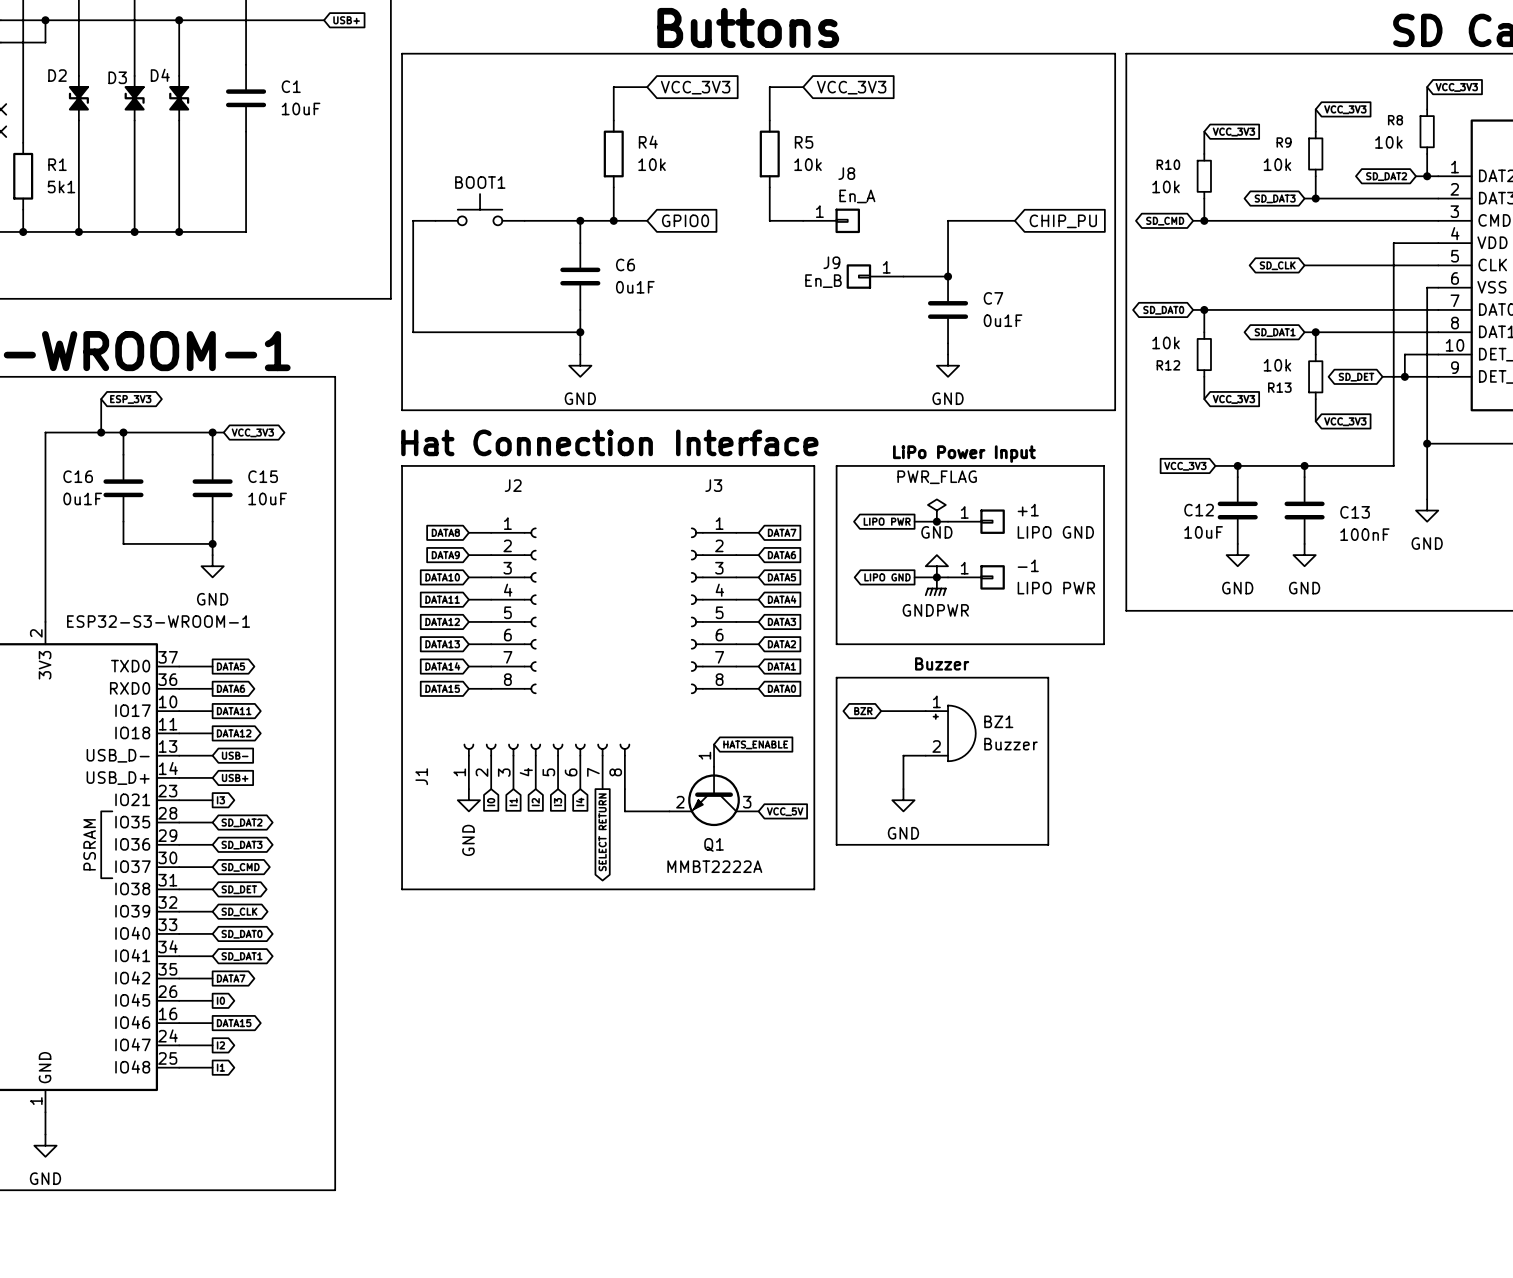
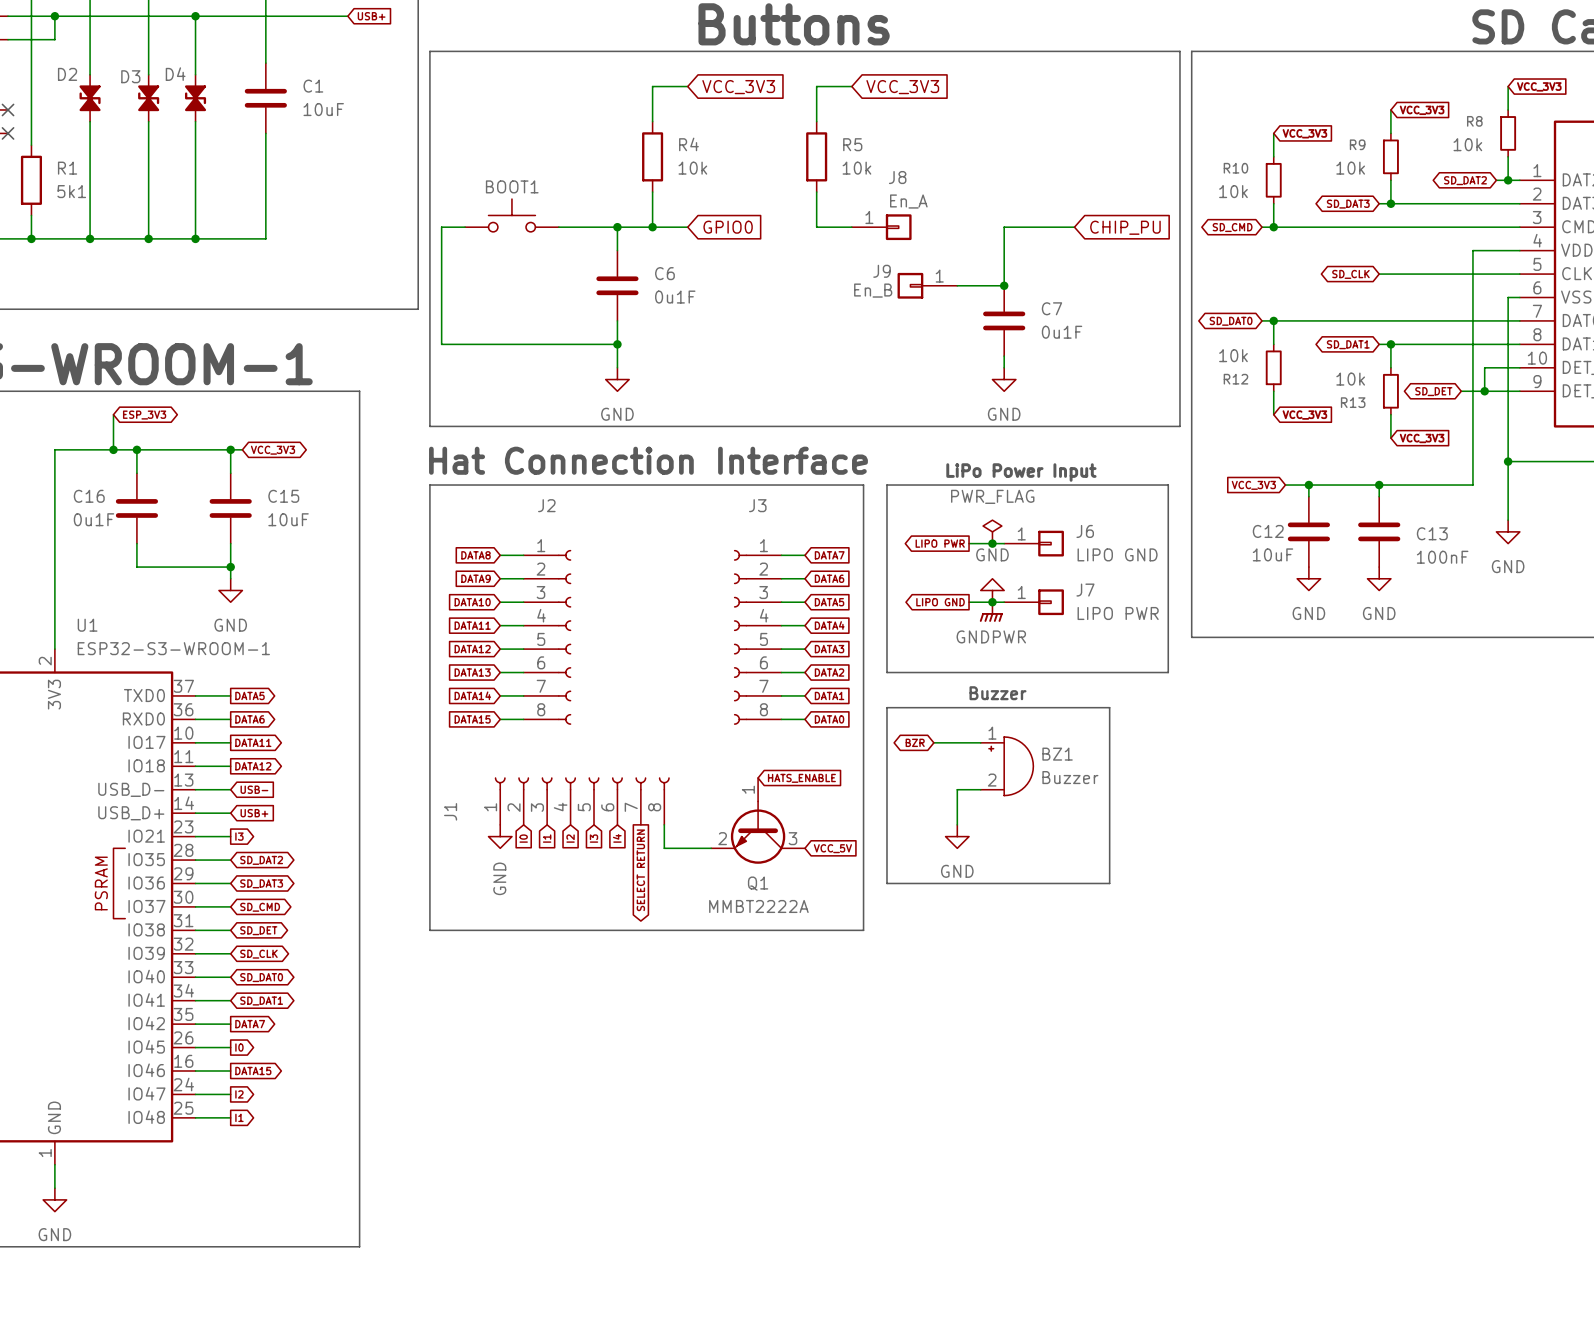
+1 name: +1 (1028, 510) -> J6 (1085, 531)
-1 name: -1 (1028, 565) -> J7 (1085, 590)
U1 name: none -> U1 (87, 625)

